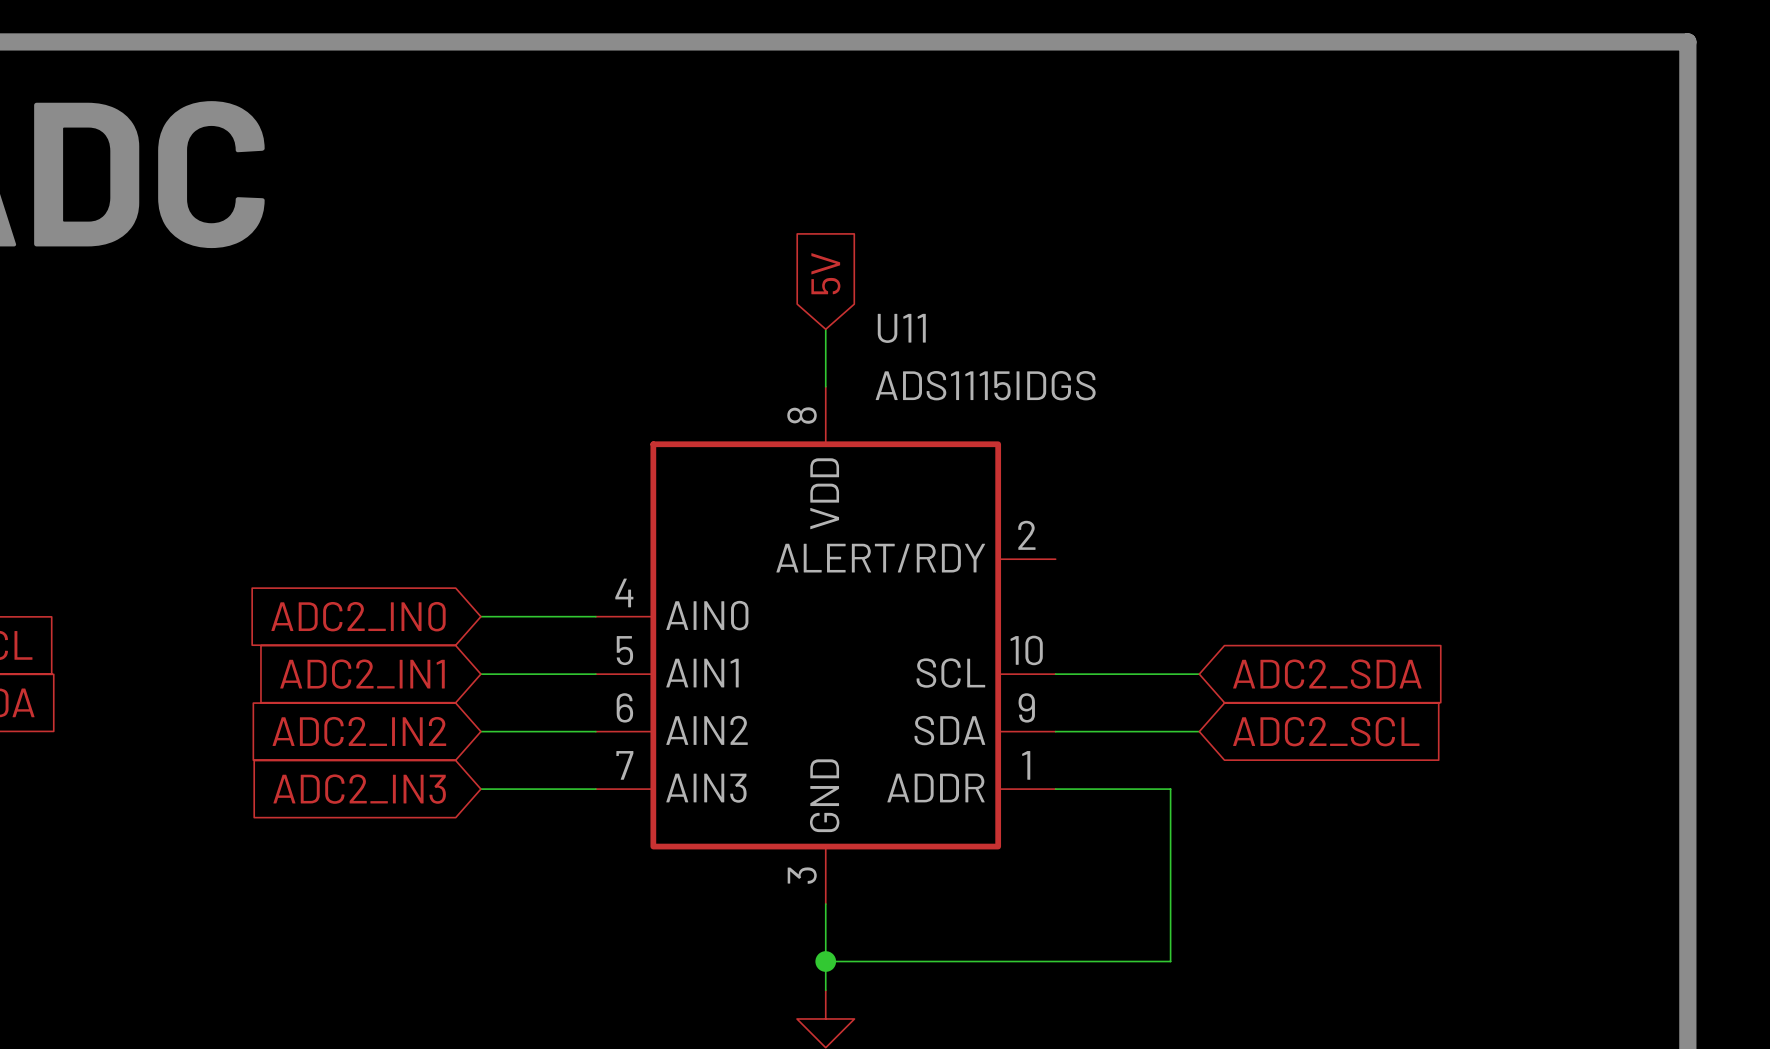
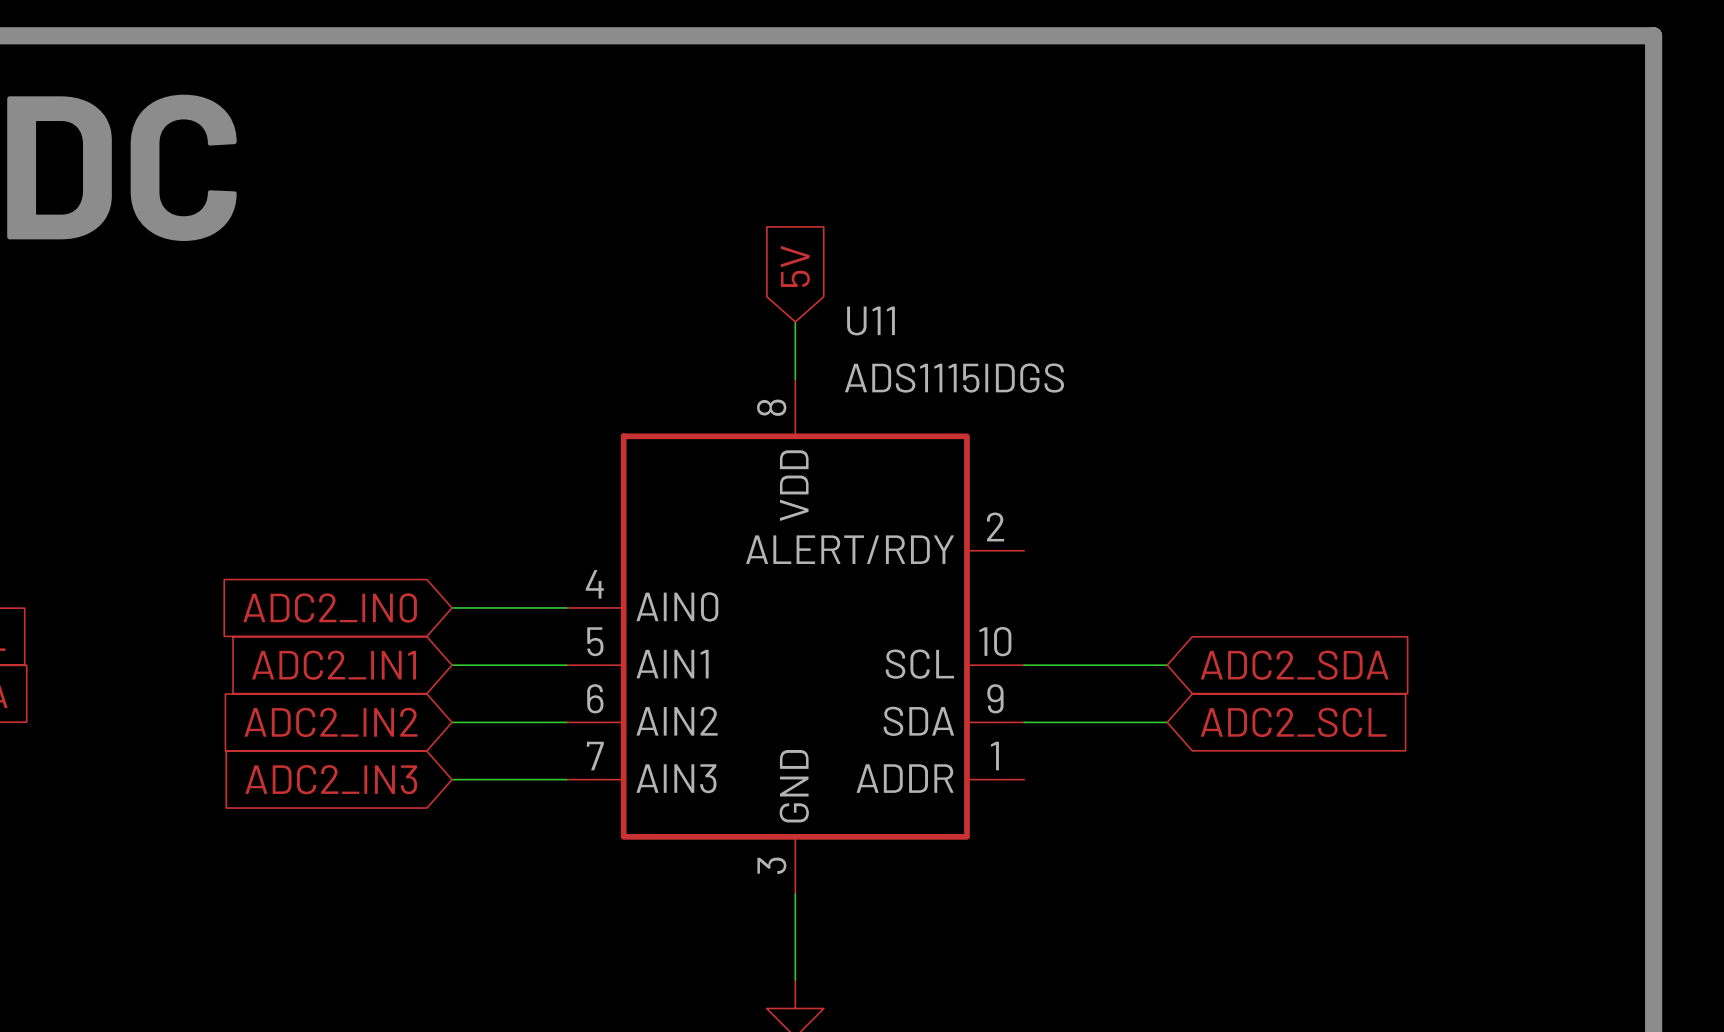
wire: (1055, 789) (1170, 789) (1170, 961) (825, 961) -> none
junction: (825, 961) -> none

